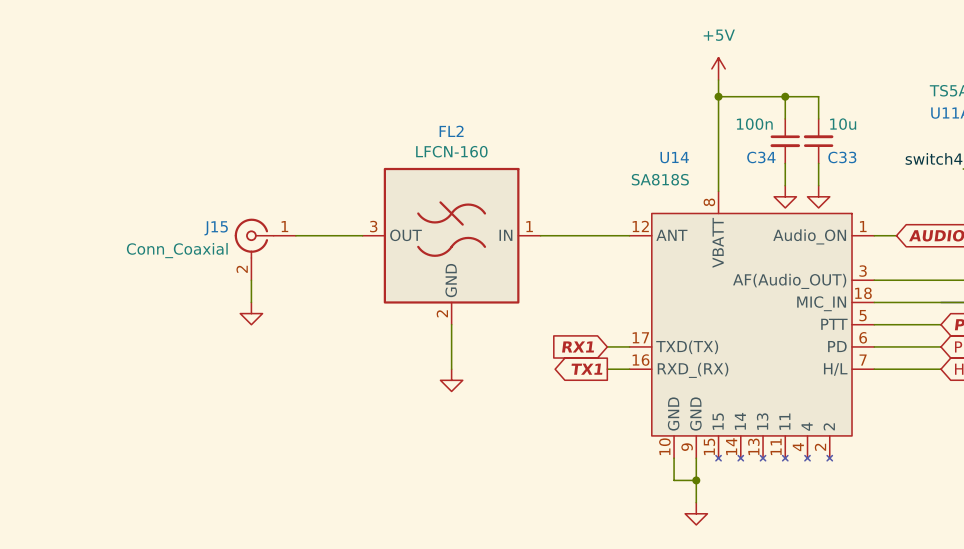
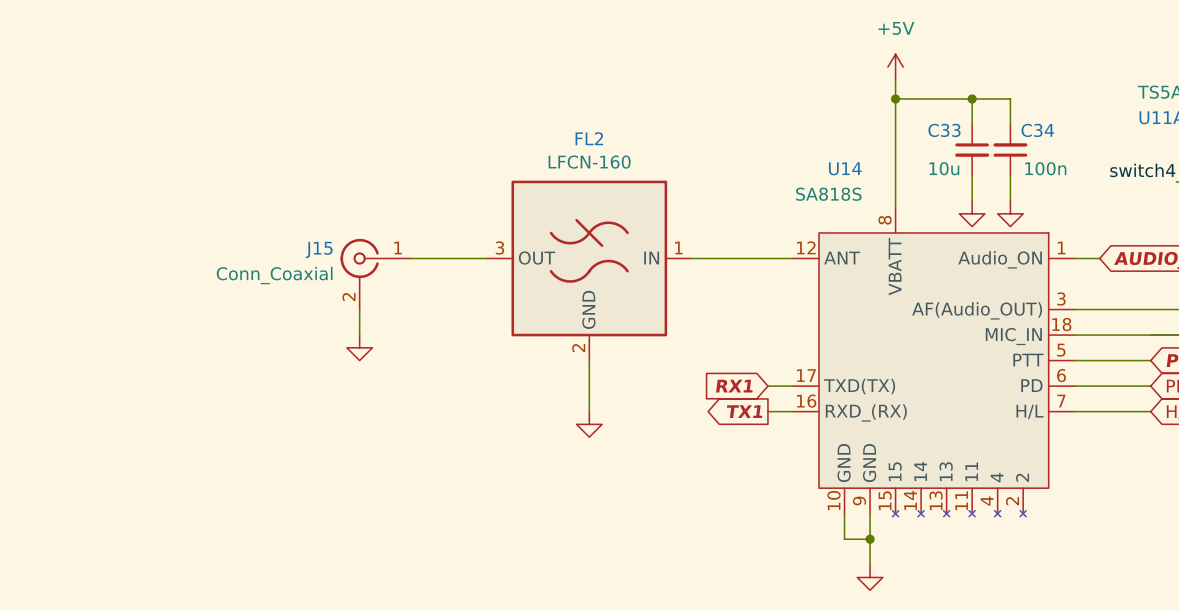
C34 value: 100n (754, 124) -> 10u (944, 168)
C33 value: 10u (843, 124) -> 100n (1045, 168)
C34 name: C34 (761, 157) -> C33 (944, 130)
C33 name: C33 (842, 157) -> C34 (1037, 130)

